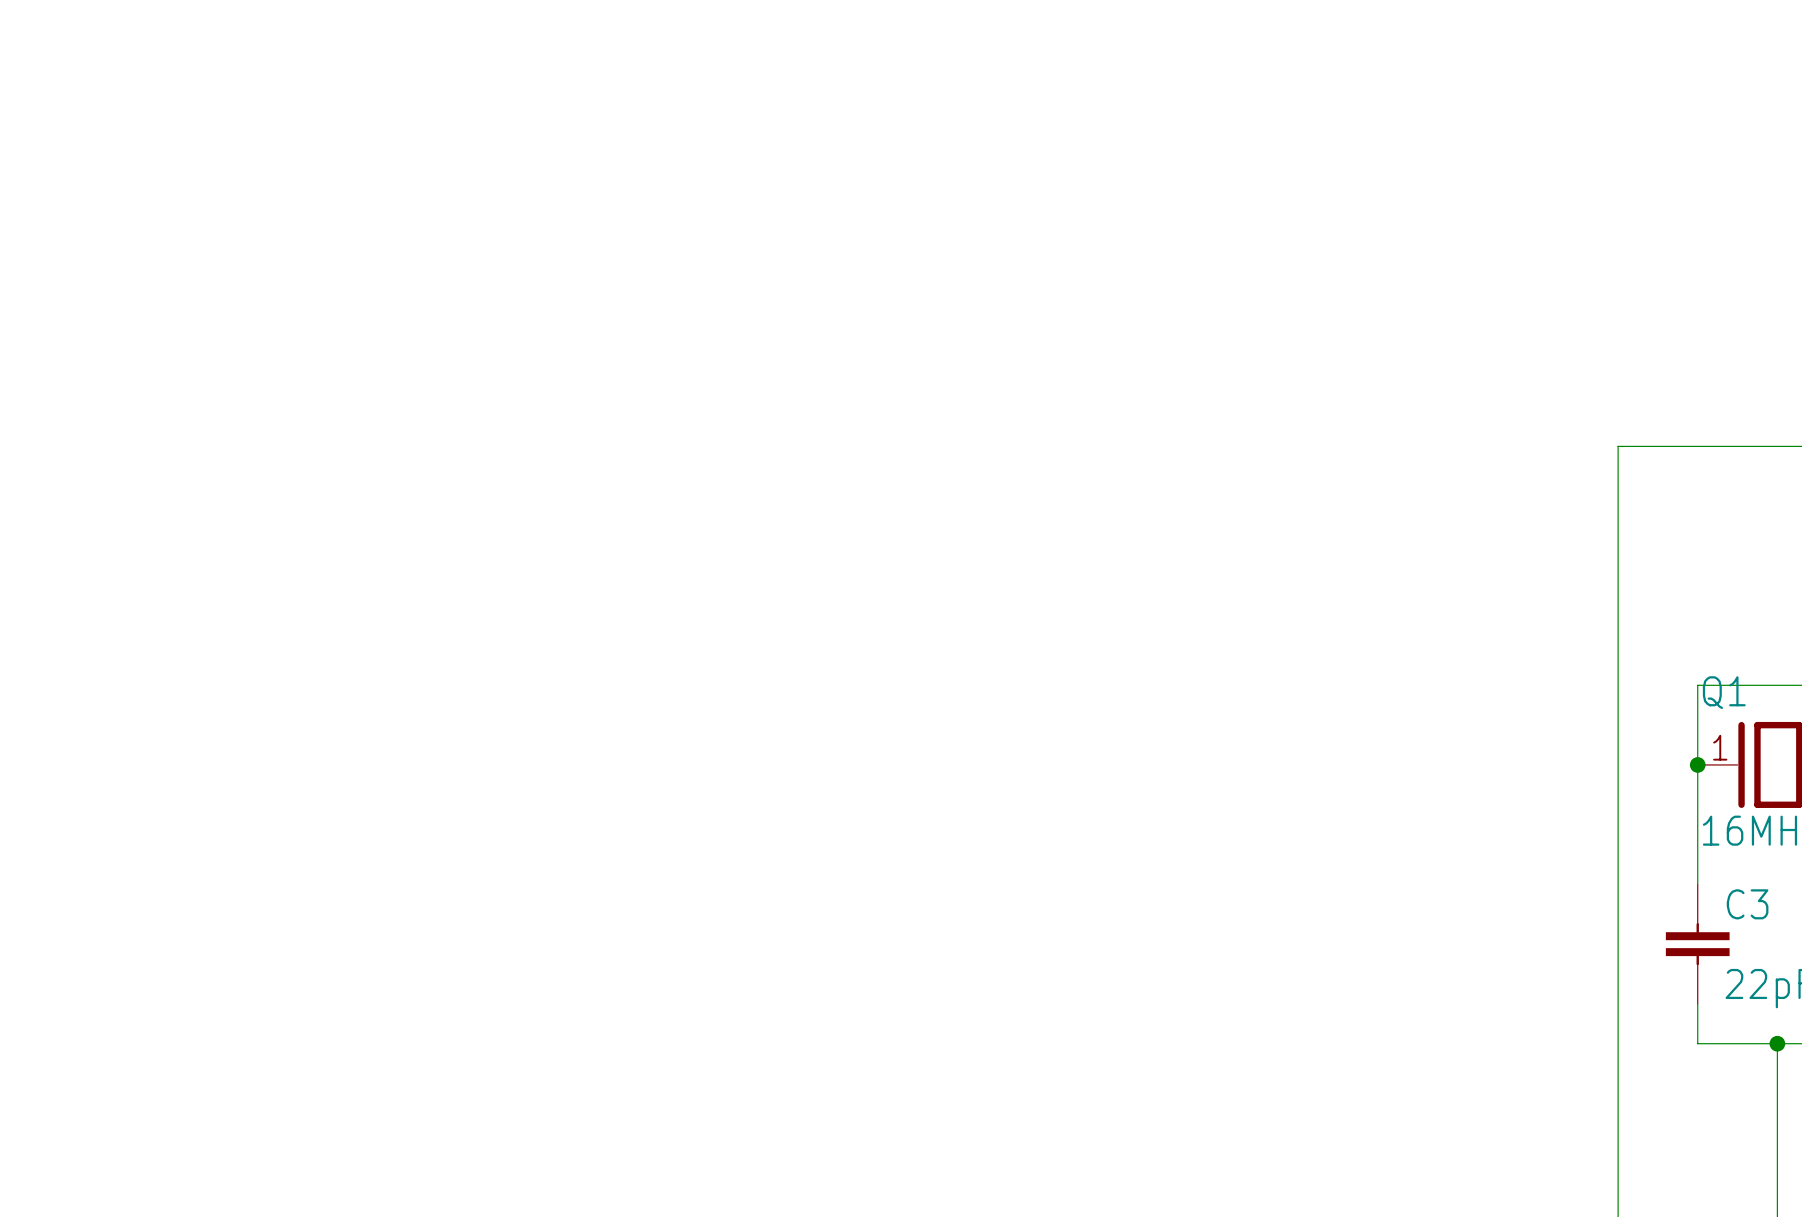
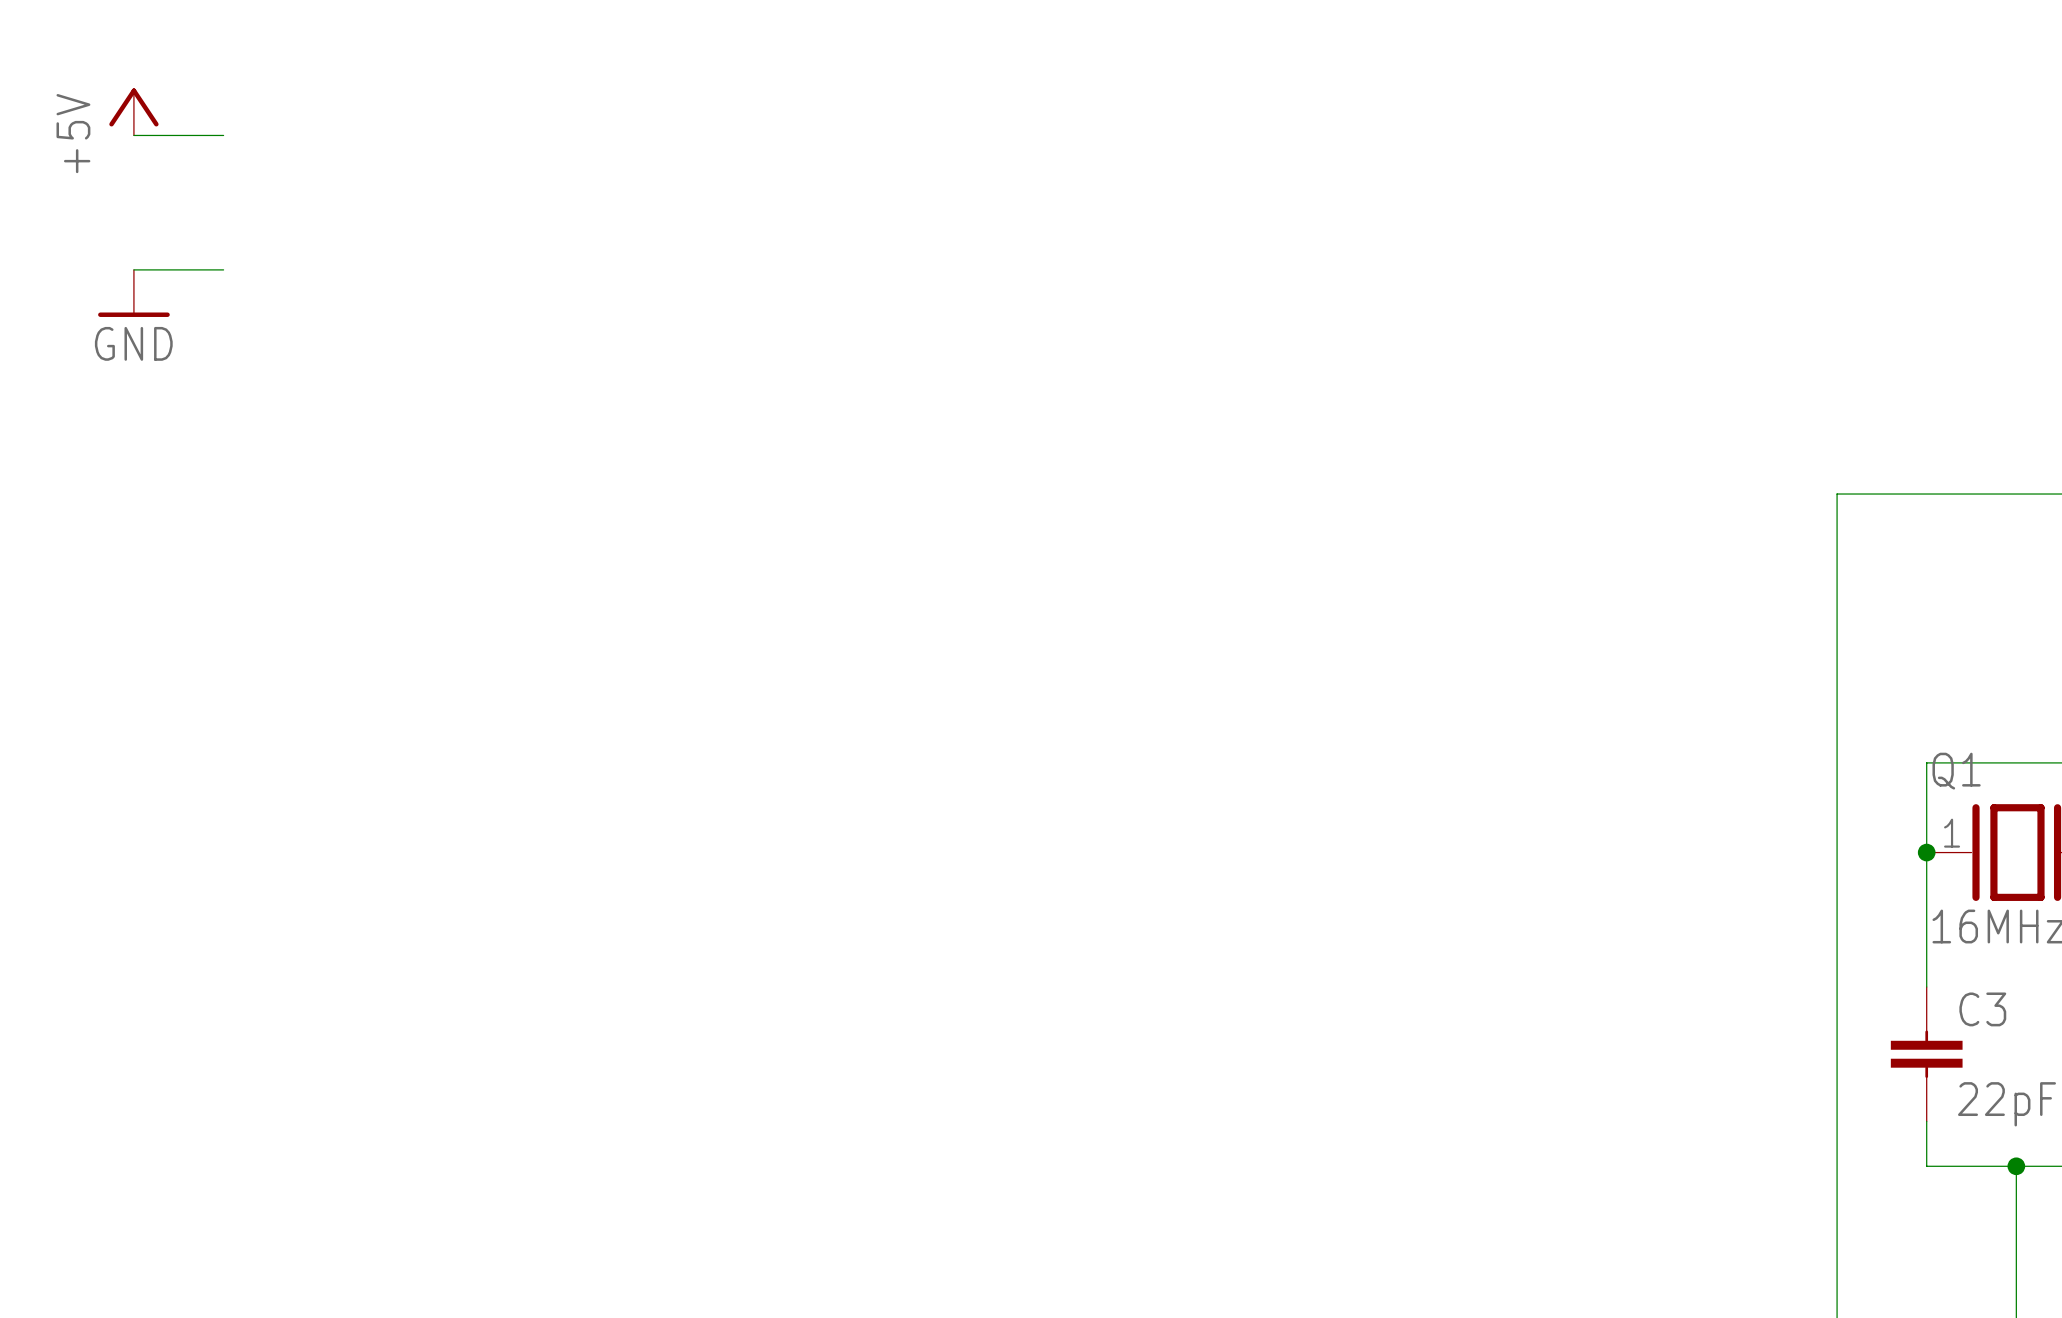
power symbol: none -> +5V (133, 111)
wire: none -> (133, 135) (223, 135)
wire: none -> (133, 269) (223, 269)
power symbol: none -> GND (133, 293)

